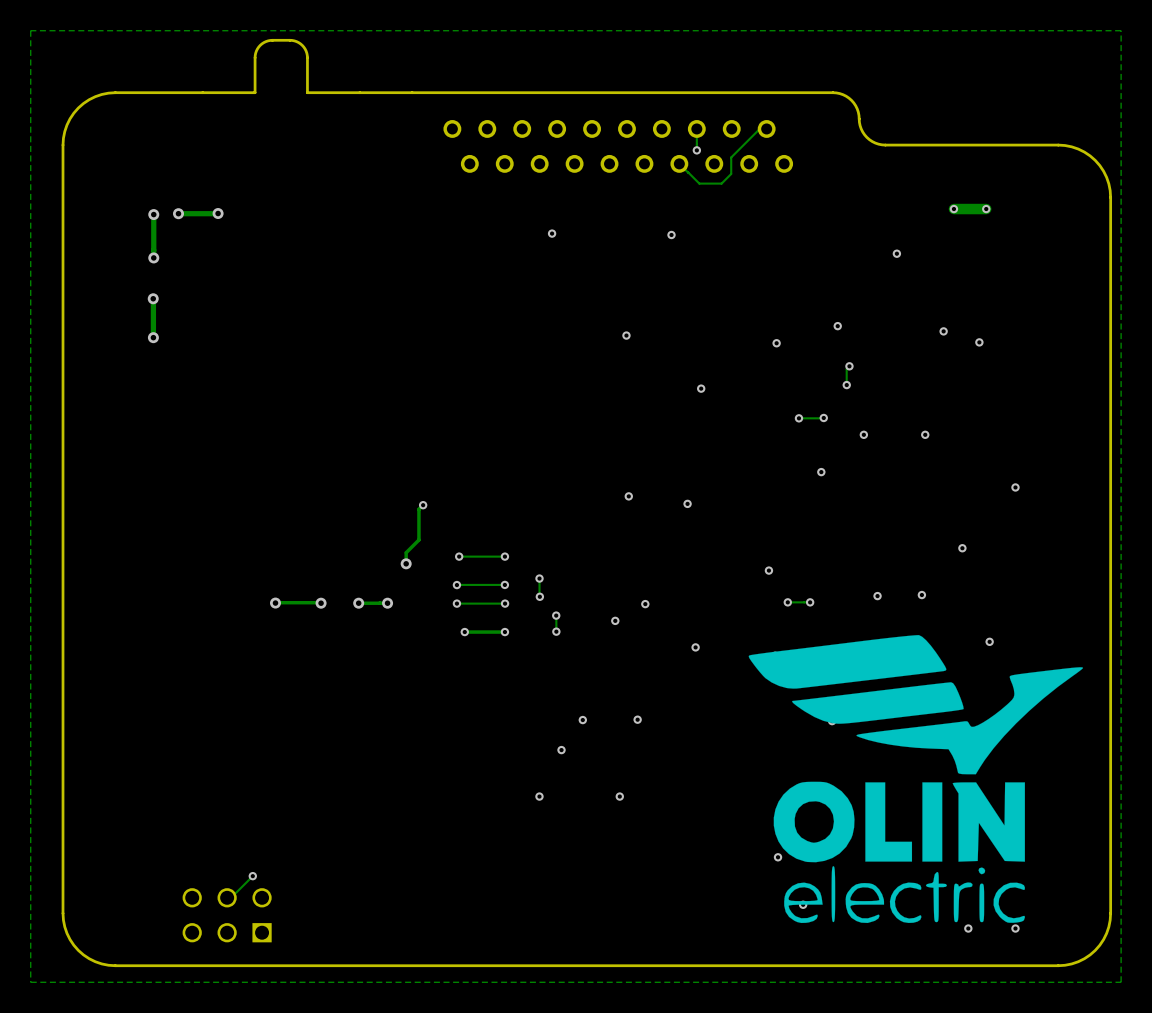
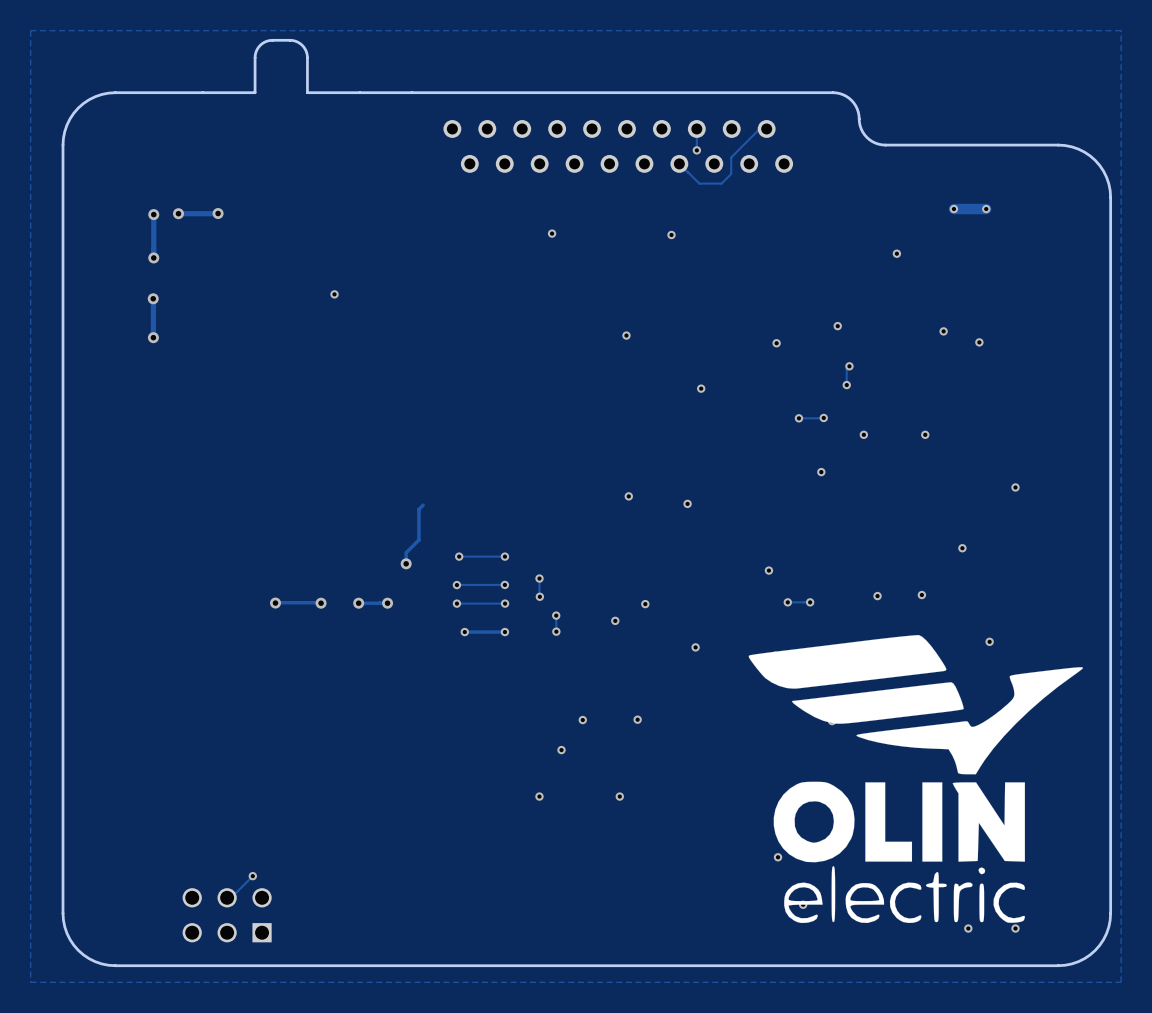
via: none -> (334, 294)
via: (423, 505) -> none

